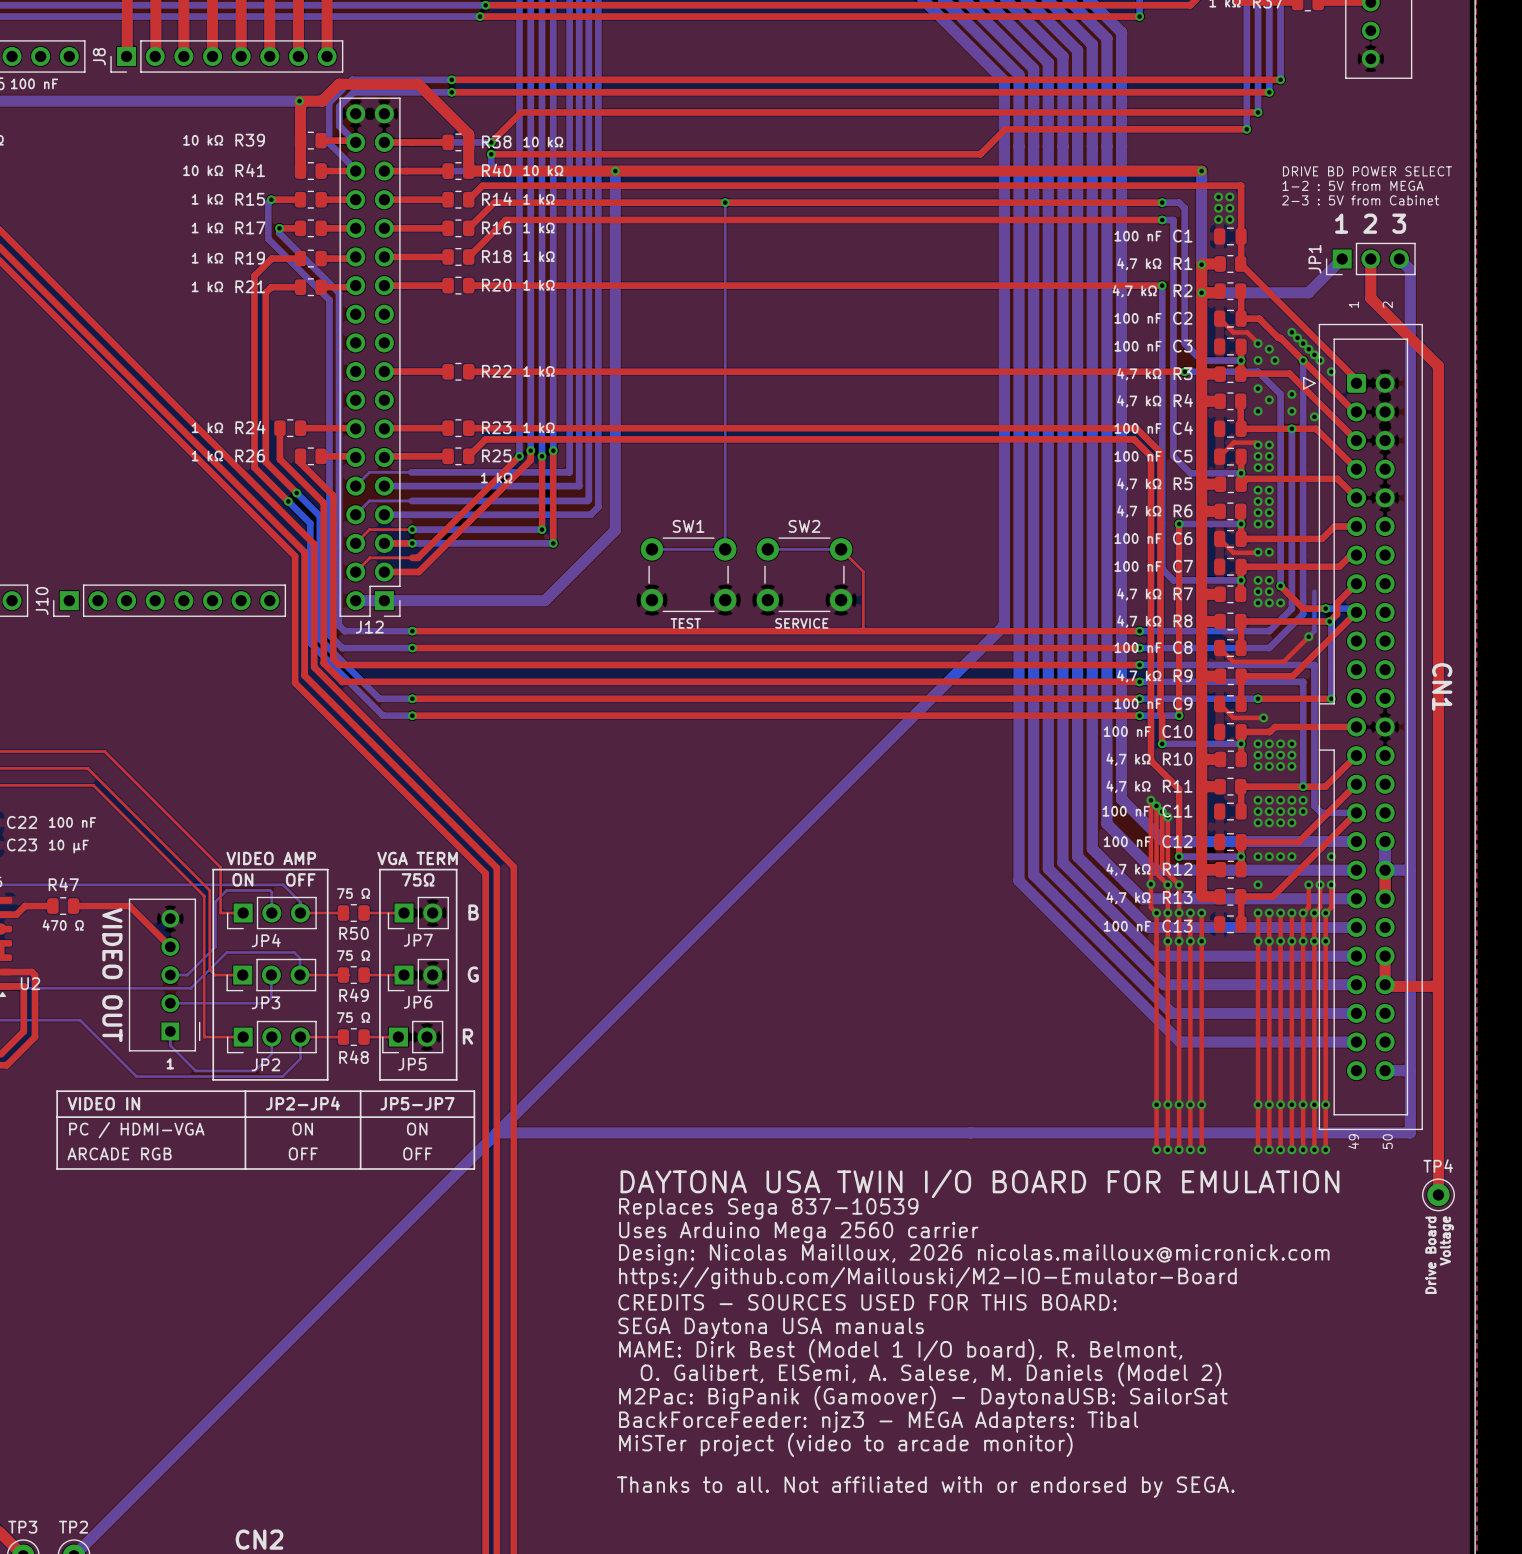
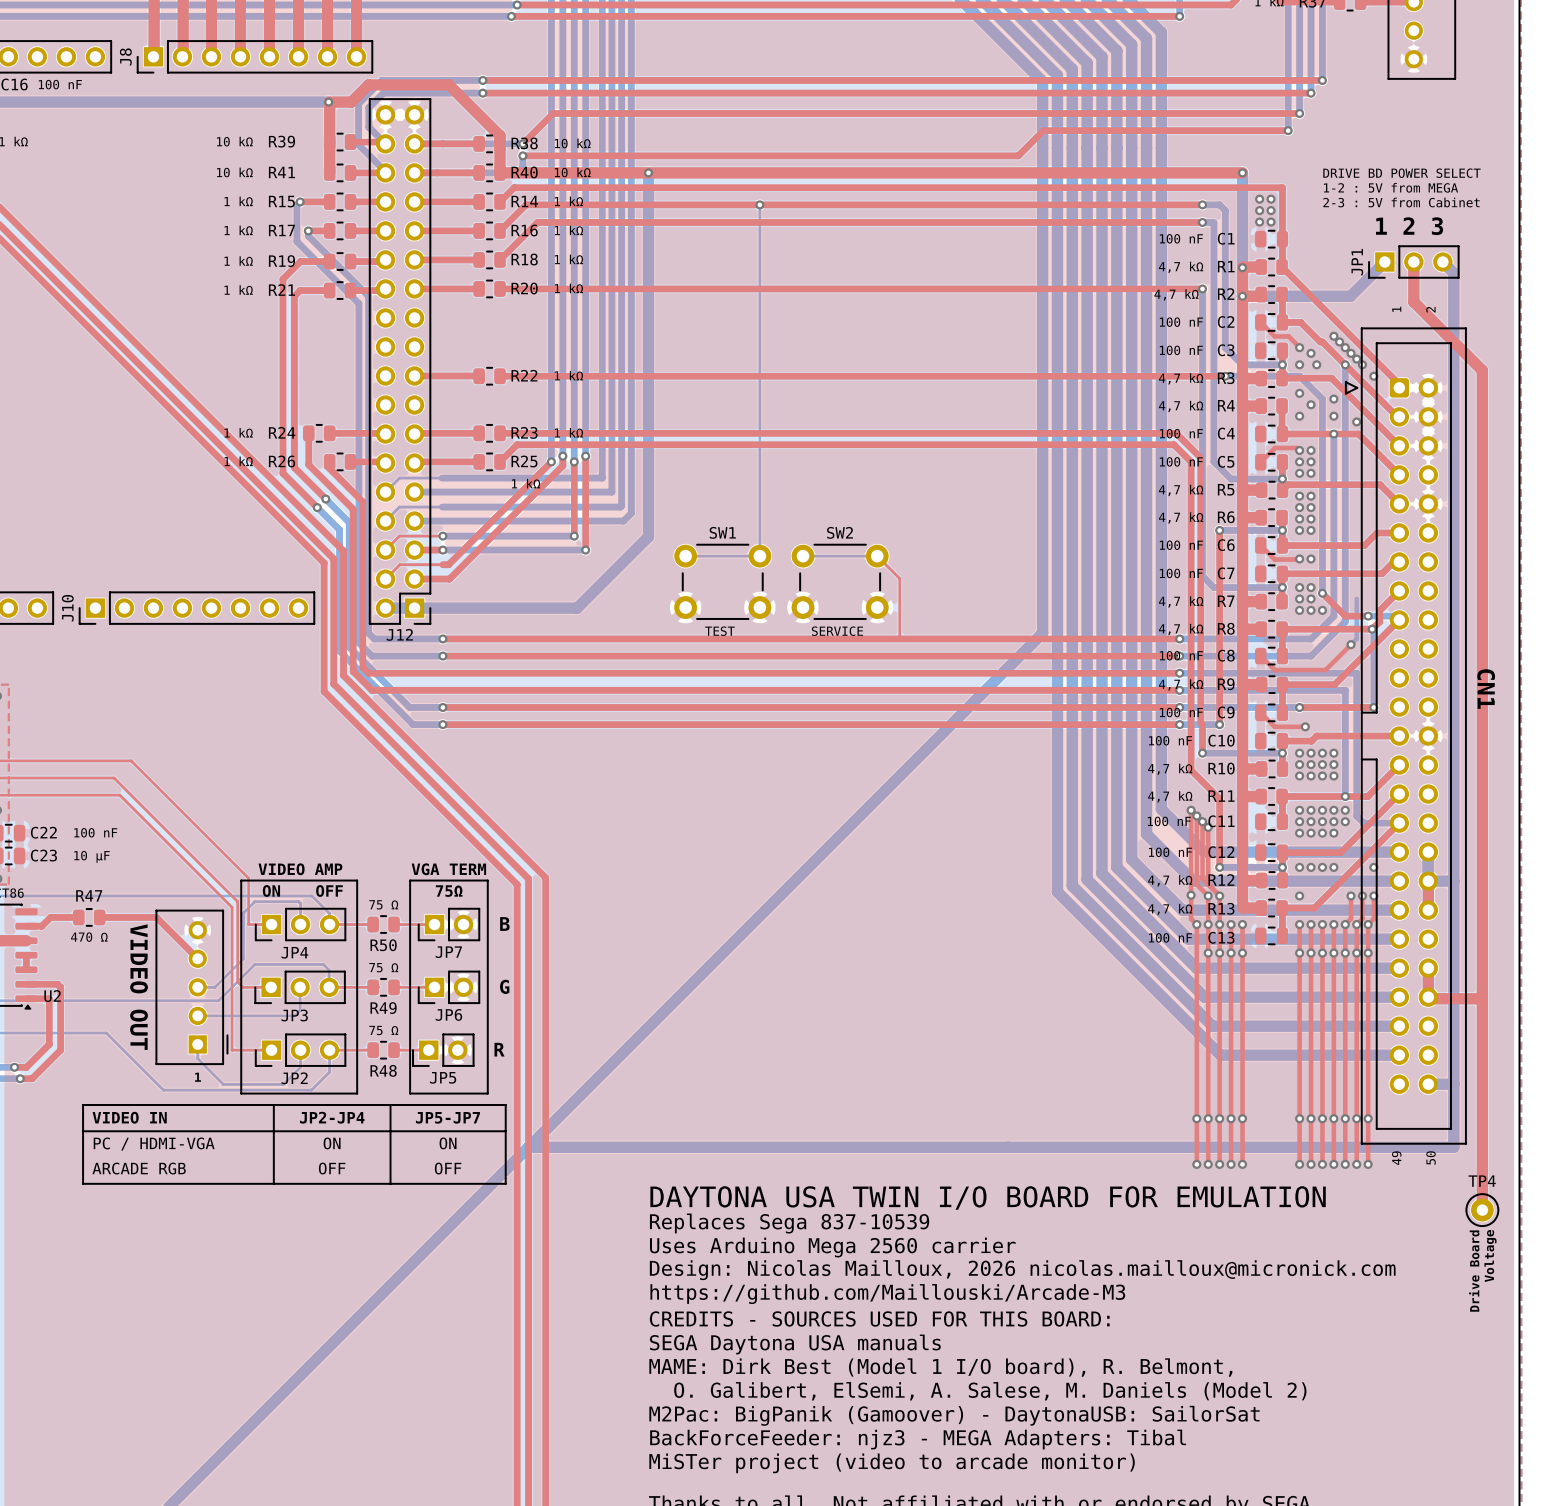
text: https://github.com/Maillouski/M2-IO-Emulator-Board (927, 1278) -> https://github.com/Maillouski/Arcade-M3 (887, 1294)

